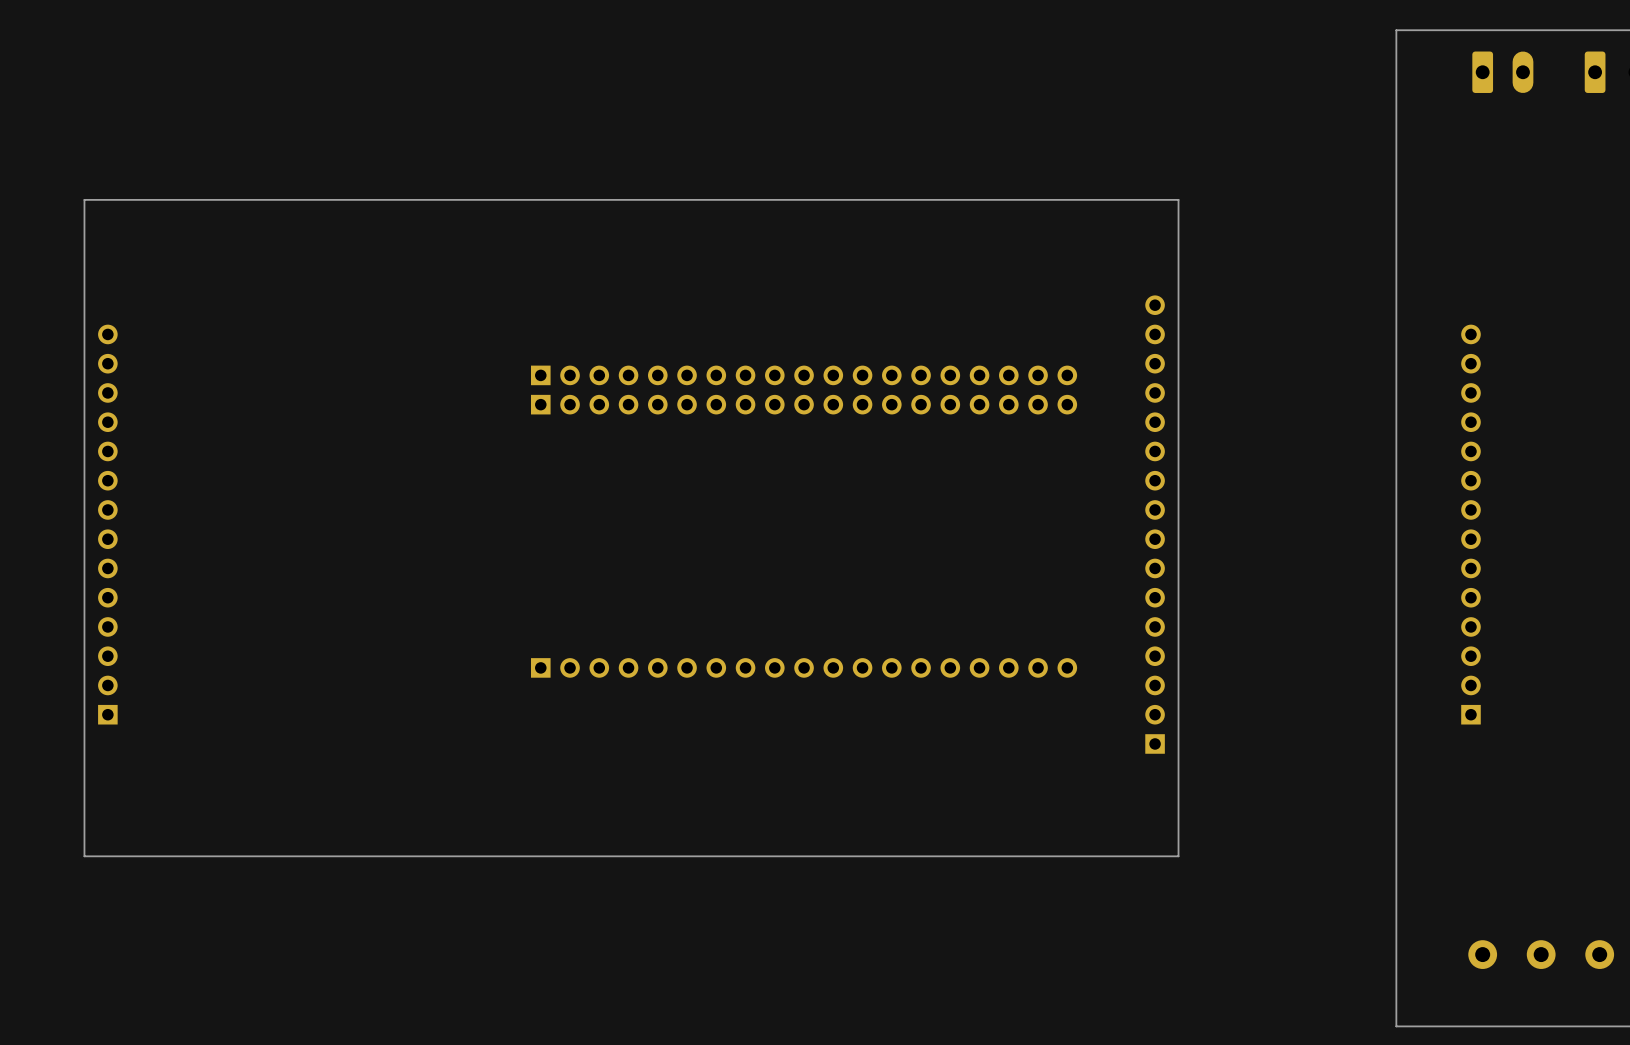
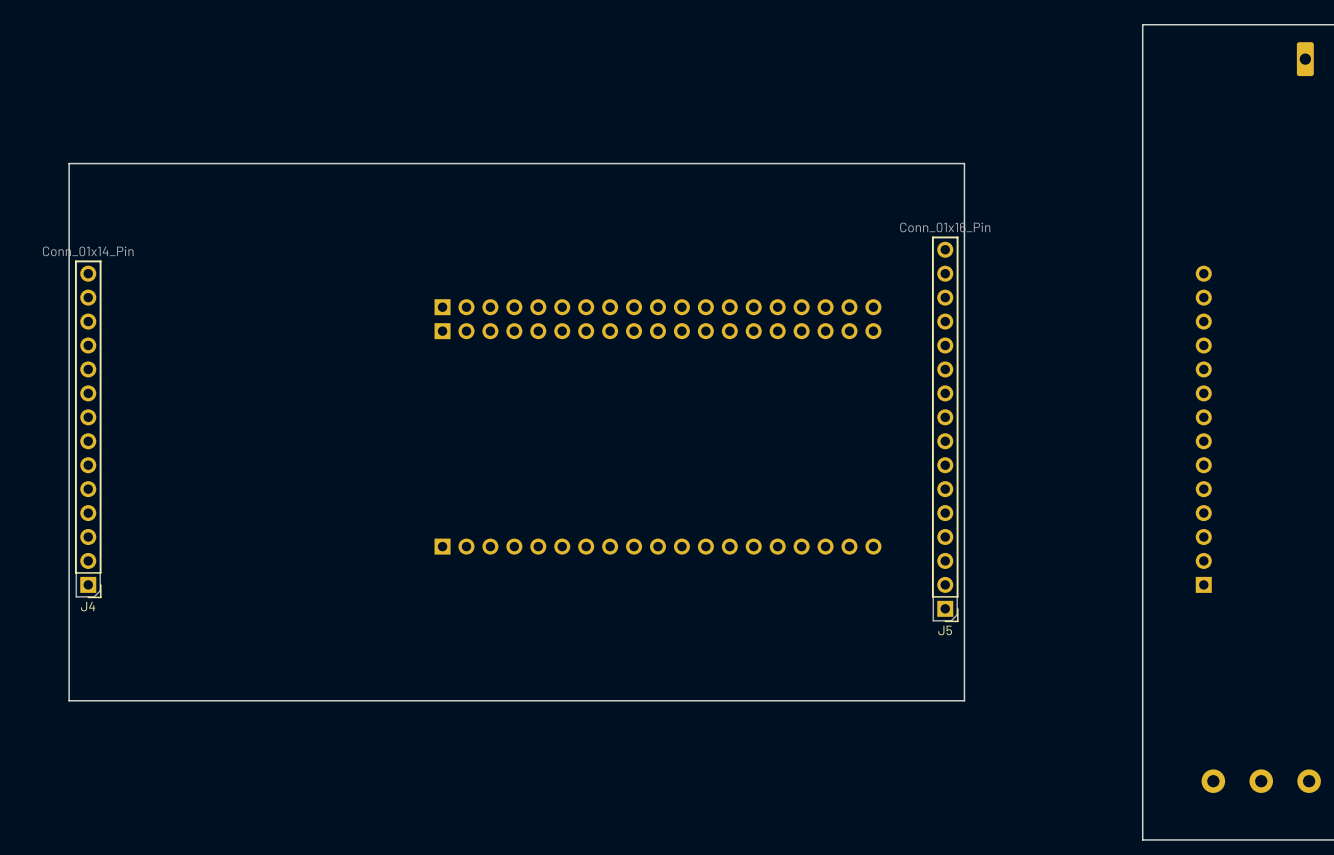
part: (1502, 72) -> none
J4 side: top (107, 524) -> bottom (88, 429)
J5 side: top (1155, 524) -> bottom (945, 429)

